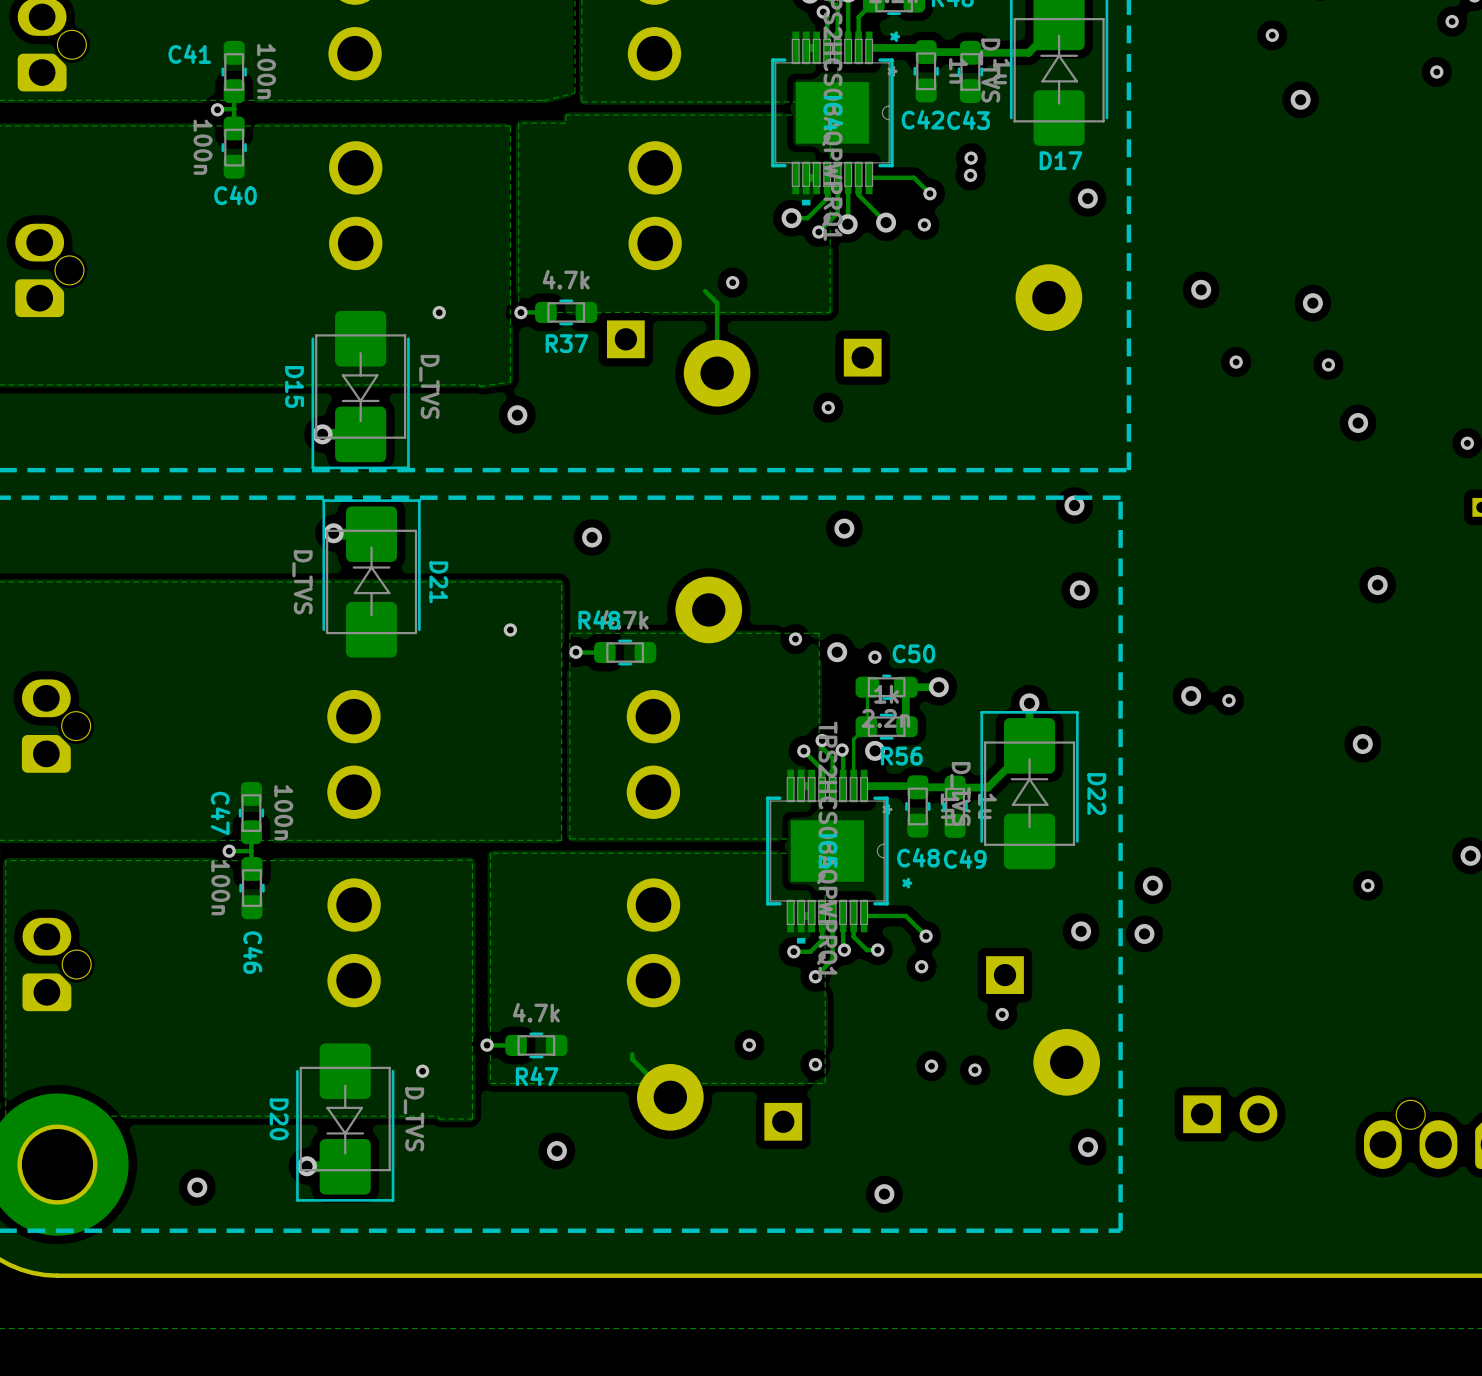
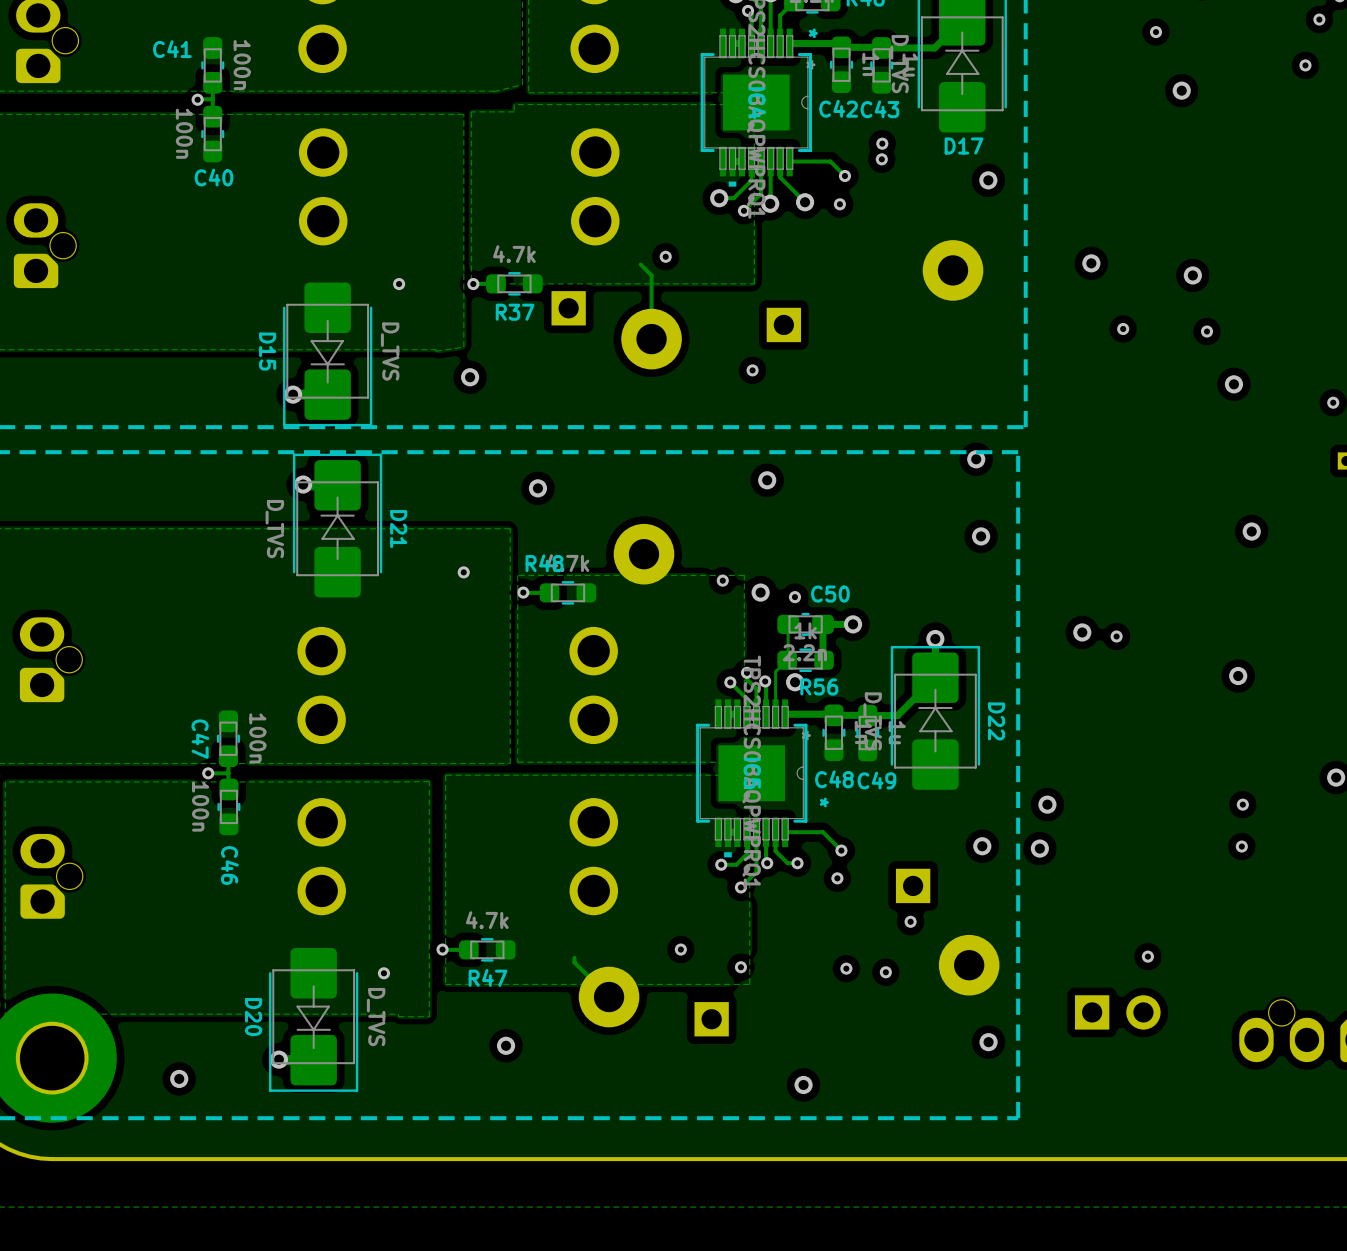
via: none -> (1241, 846)
via: none -> (1147, 956)

